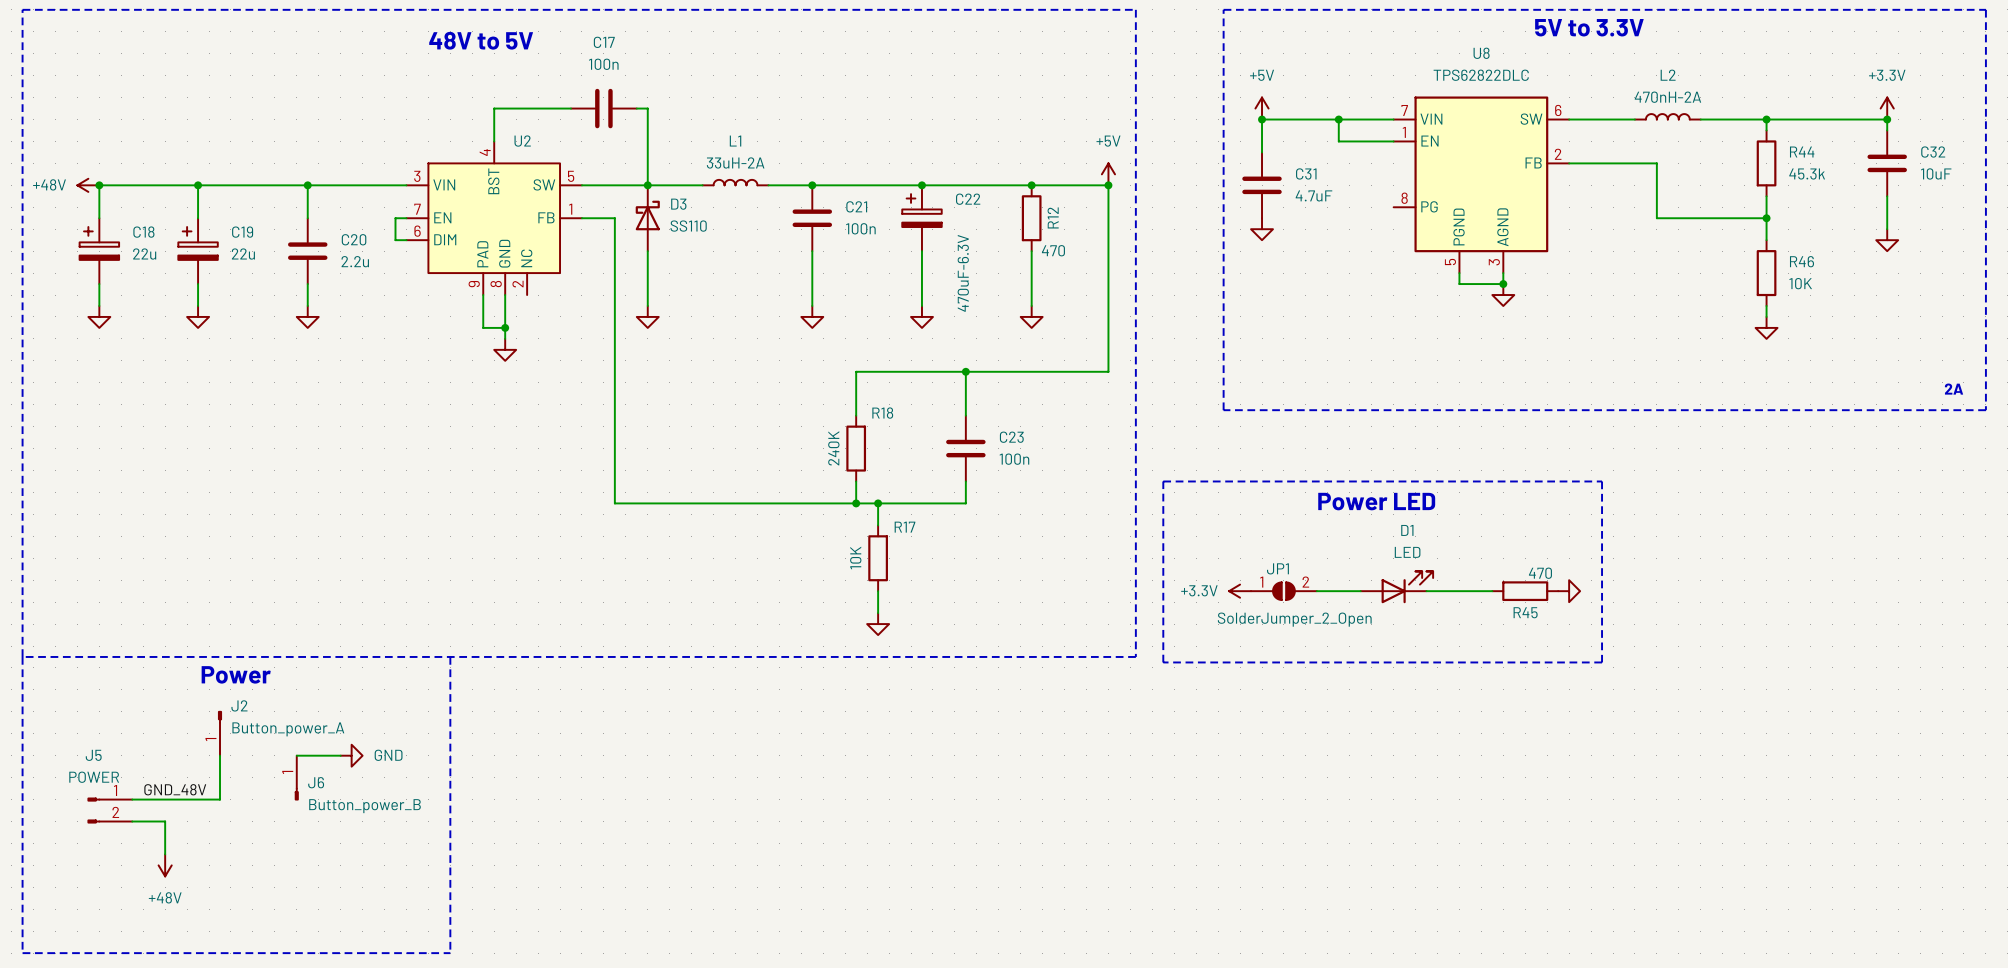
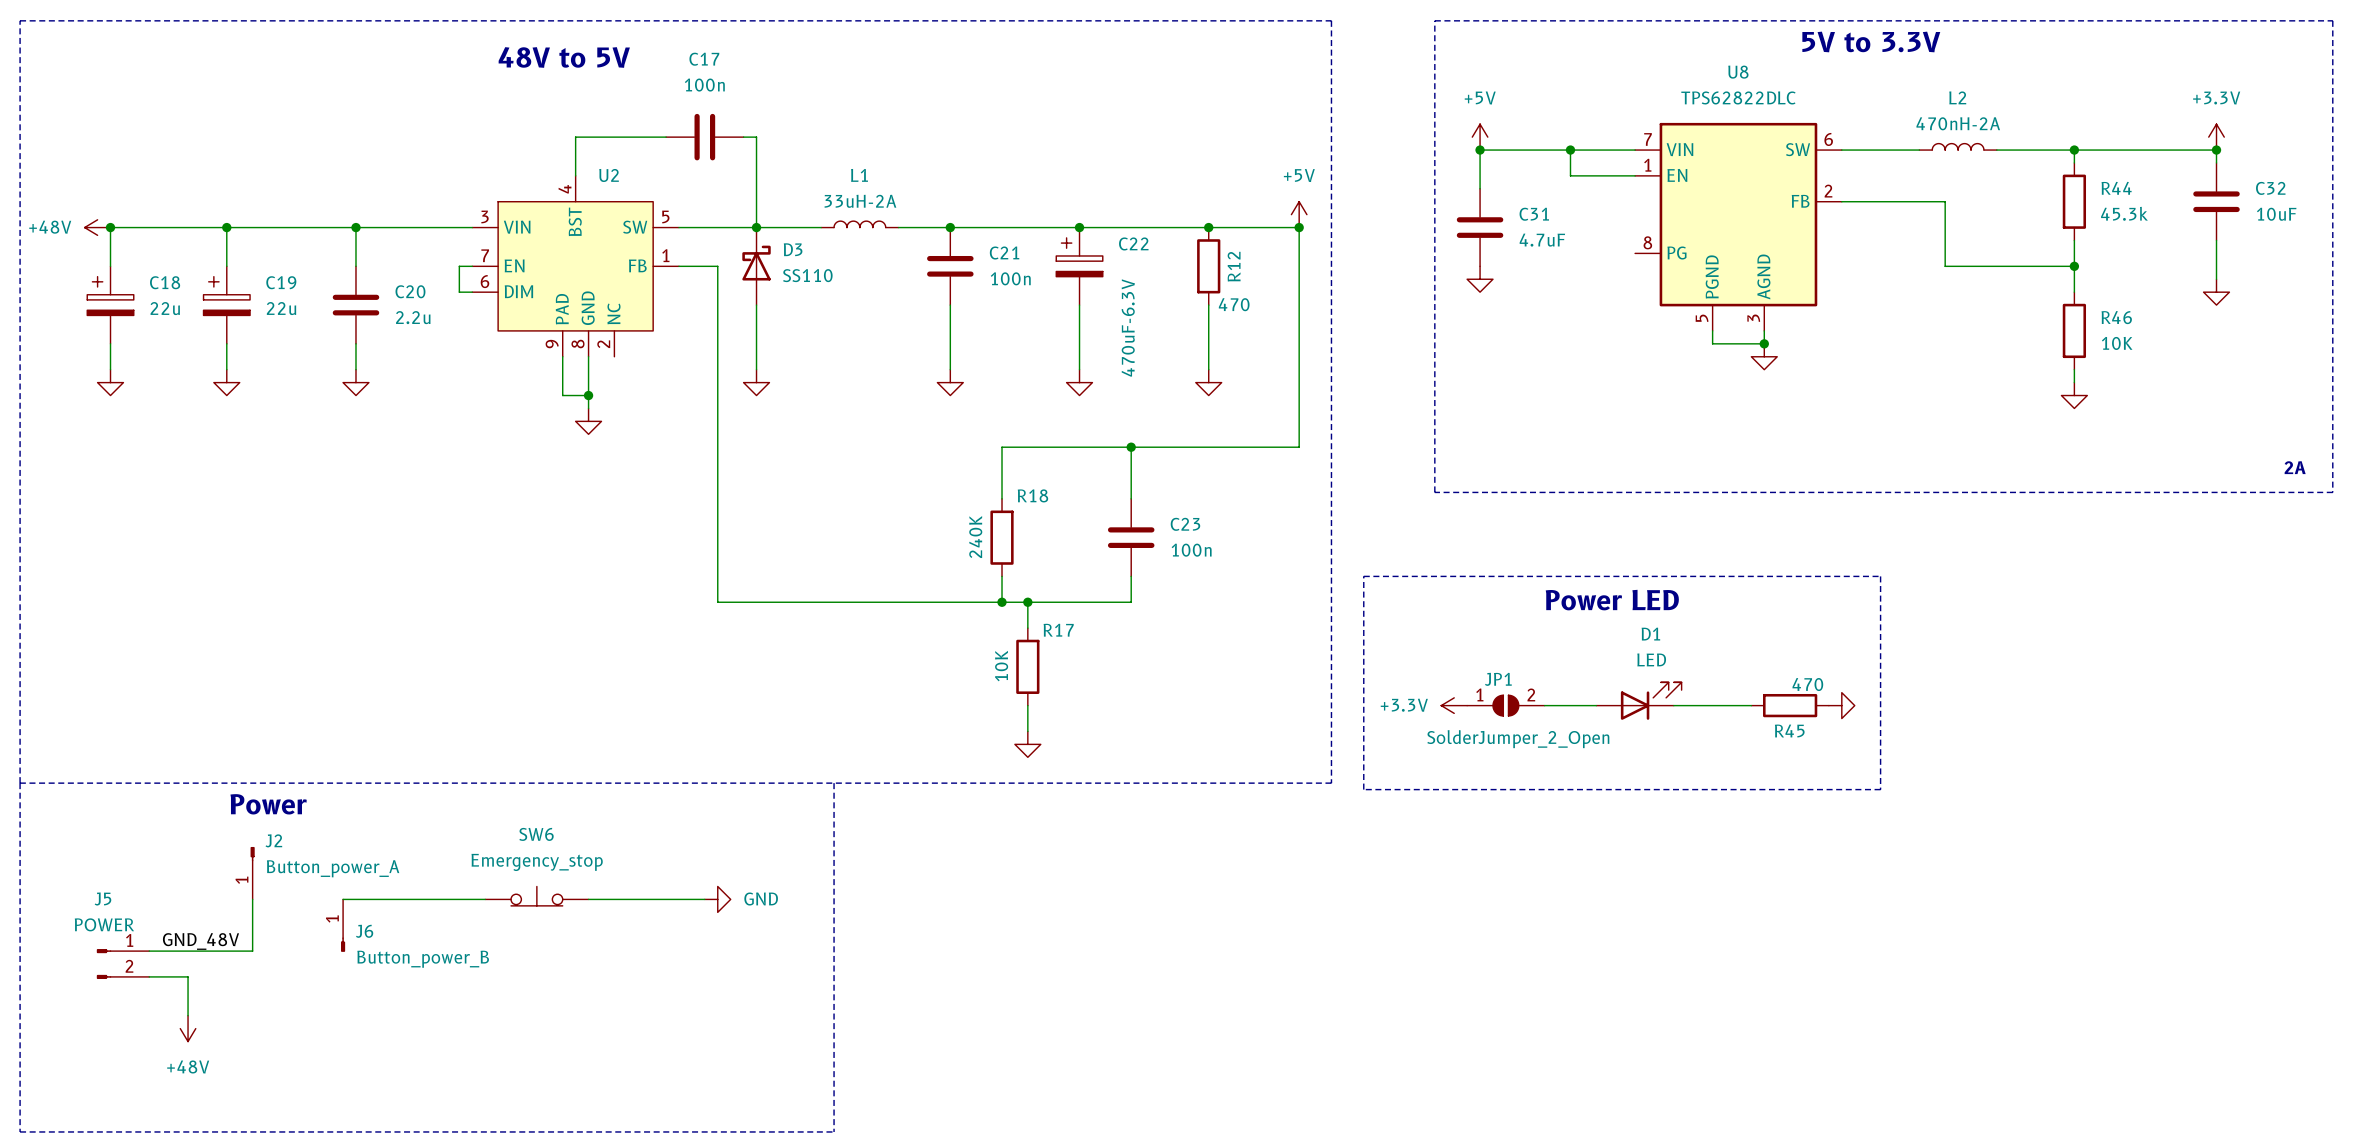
line: (450, 656) (450, 953) -> (834, 783) (834, 1131) (523, 1131)
SW6: none -> Emergency_stop (536, 896)
wire: none -> (394, 899) (485, 899)
power symbol: GND (351, 755) -> none
wire: none -> (588, 899) (704, 899)
power symbol: none -> GND (717, 899)

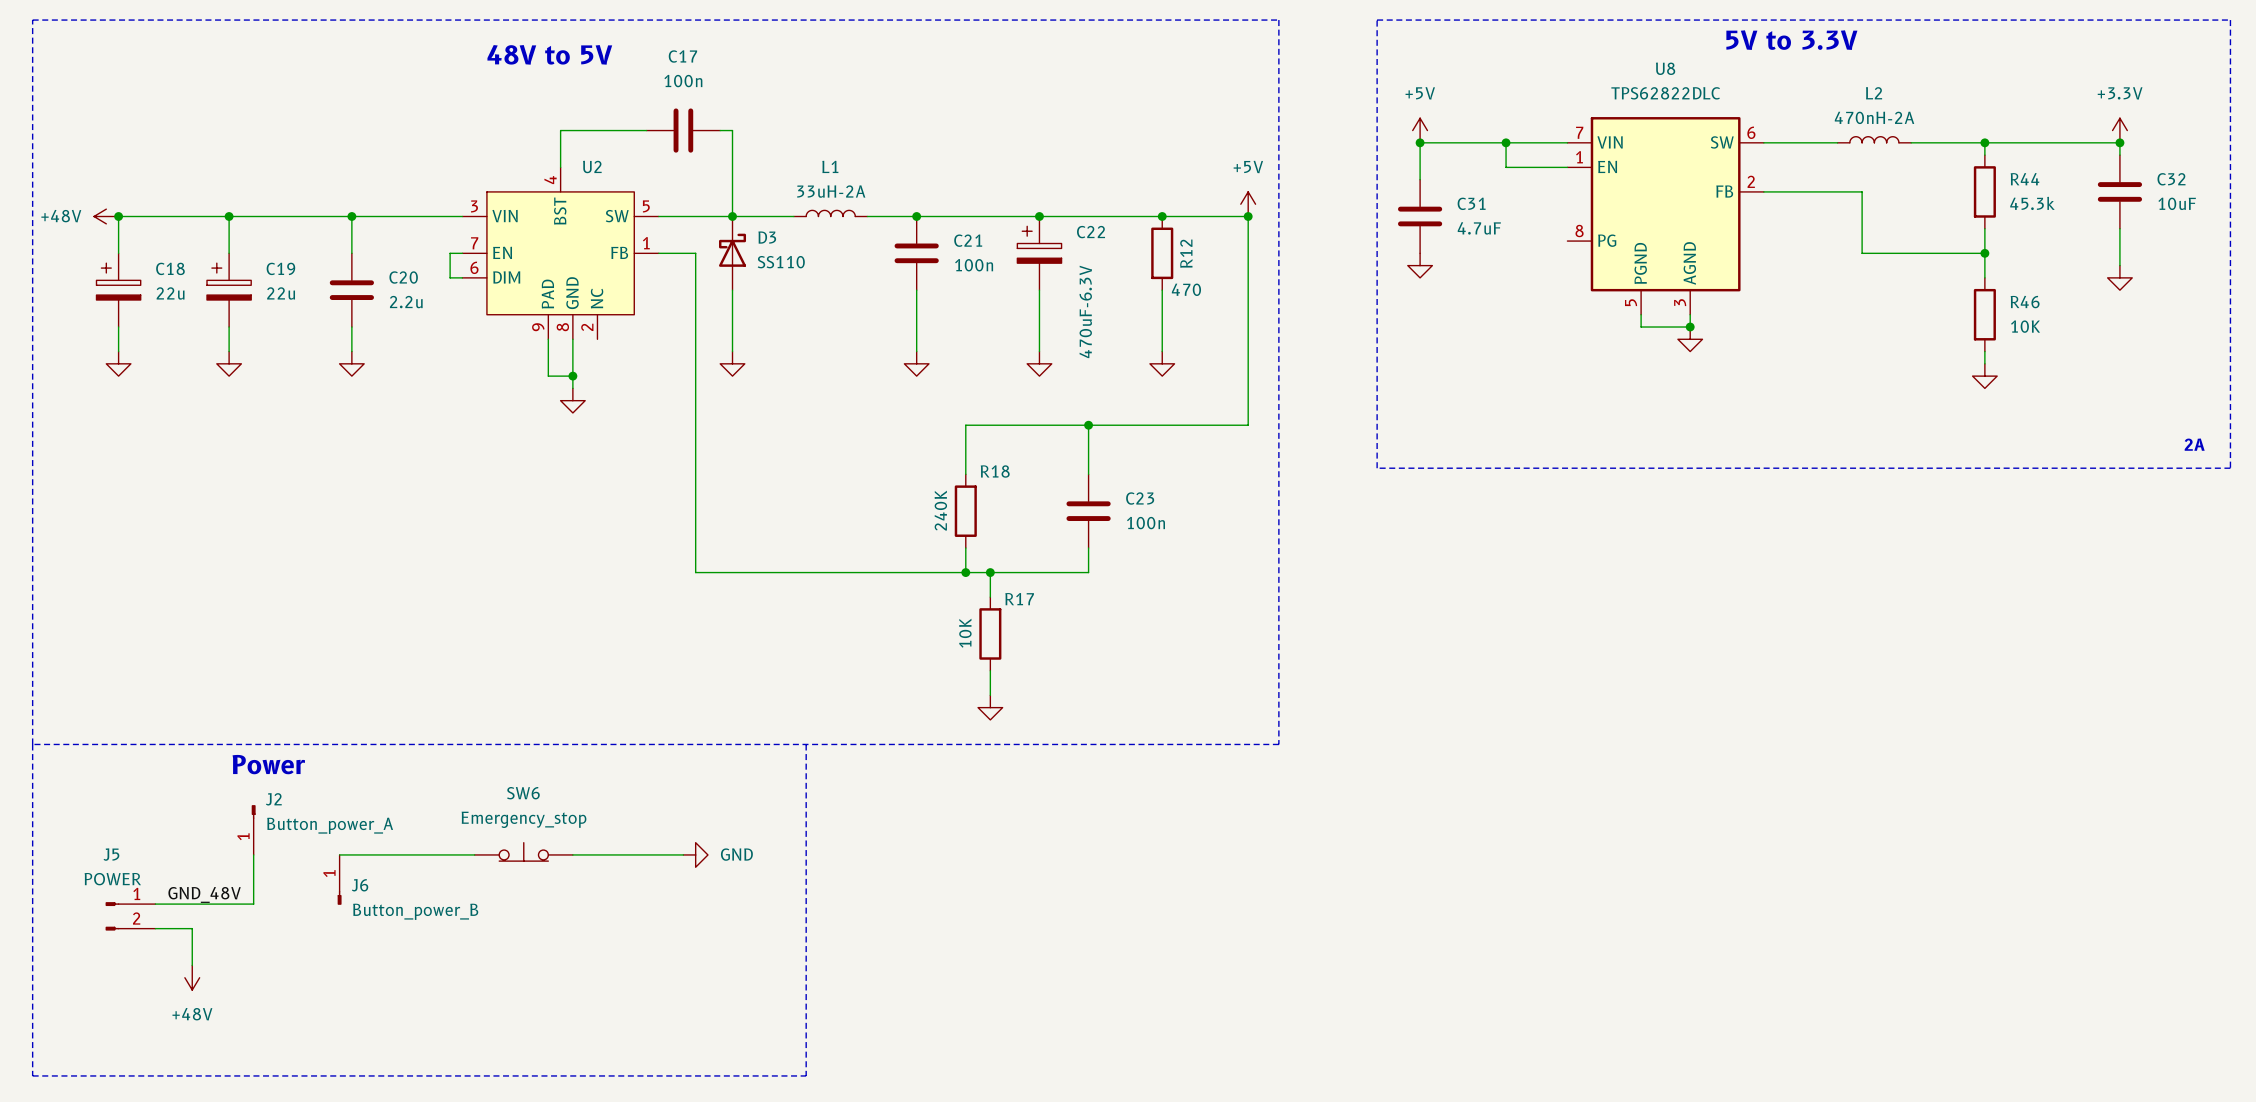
line: (1363, 576) (1880, 576) (1880, 789) (1363, 789) (1363, 576) -> none
text: Power LED (1612, 600) -> none
D1: LED (1638, 701) -> none
power symbol: +3.3V (1454, 705) -> none
JP1: SolderJumper_2_Open (1505, 705) -> none
wire: (1544, 705) (1596, 705) -> none
wire: (1673, 705) (1751, 705) -> none
R45: 470 (1790, 705) -> none
power symbol: (1841, 705) -> none

